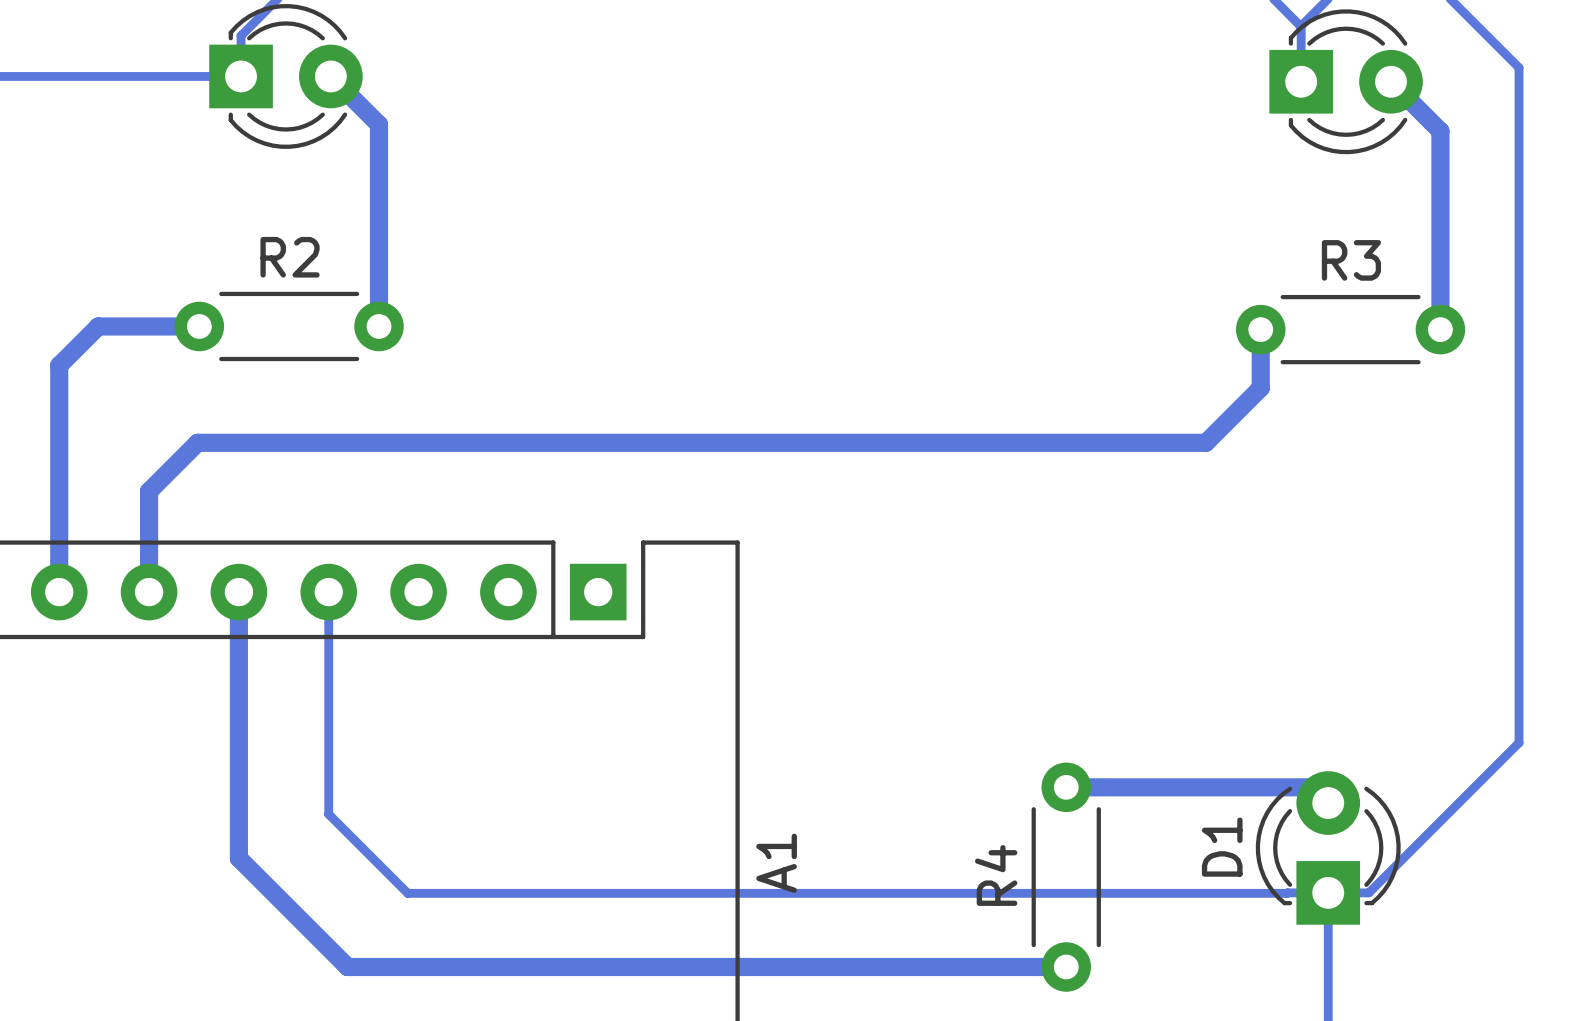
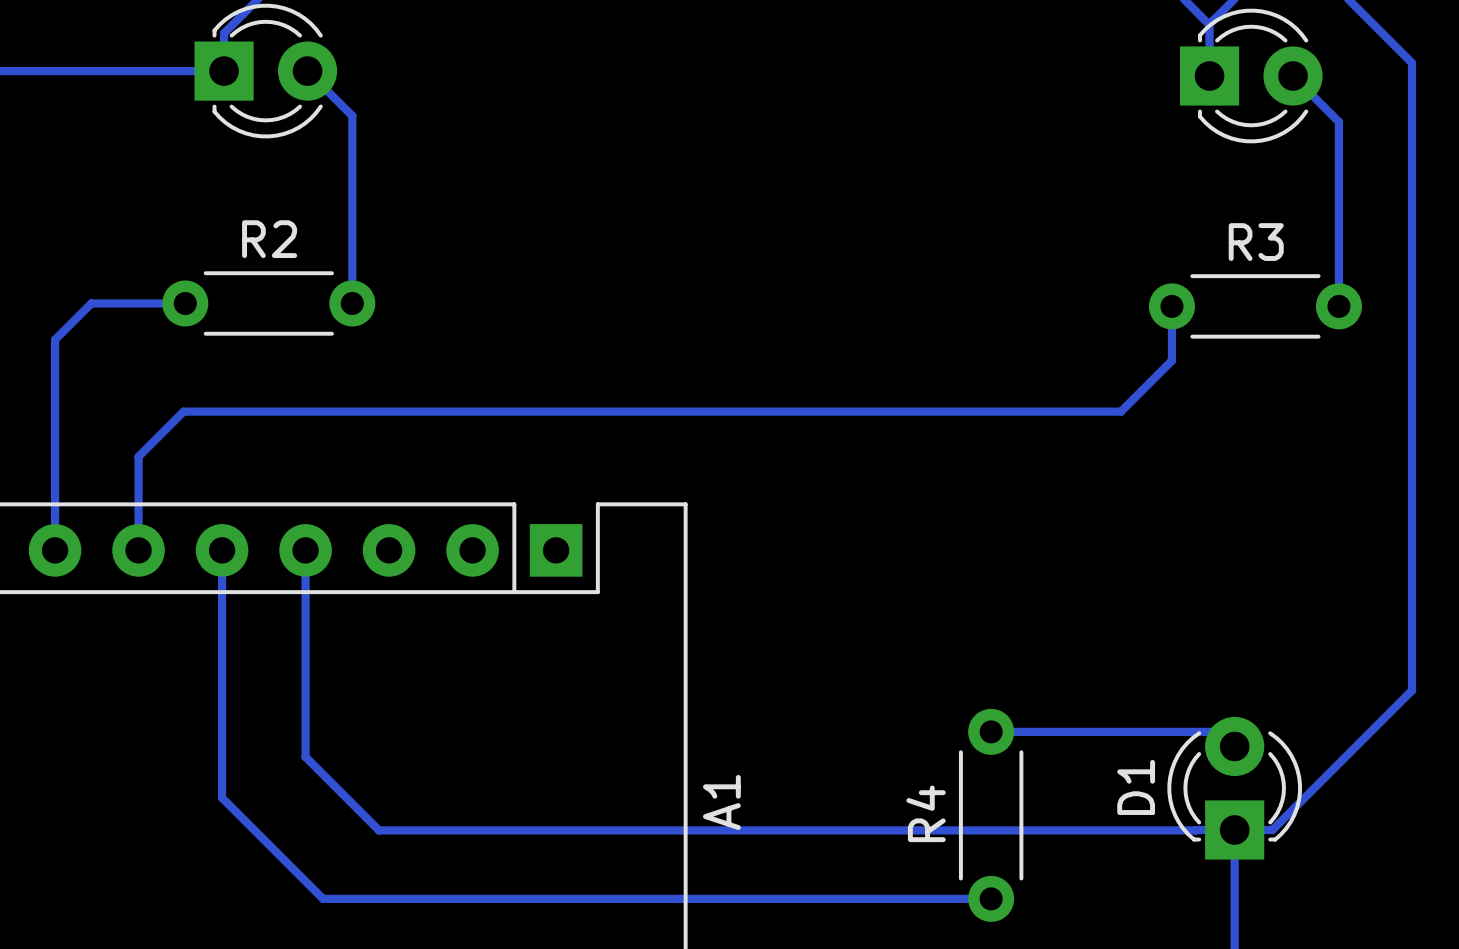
bottom track width: thick (330, 76) (379, 124) (379, 326) -> thin (307, 71) (352, 115) (352, 303)
bottom track width: thick (1391, 81) (1440, 131) (1440, 329) -> thin (1293, 76) (1338, 121) (1338, 306)
bottom track width: thick (199, 326) (98, 326) (59, 365) (59, 592) -> thin (185, 303) (91, 303) (55, 339) (55, 550)
bottom track width: thick (1260, 329) (1260, 388) (1205, 442) (197, 442) (149, 491) (149, 592) -> thin (1171, 306) (1171, 360) (1121, 411) (183, 411) (138, 456) (138, 550)
bottom track width: thick (238, 592) (238, 858) (347, 966) (1066, 966) -> thin (222, 550) (222, 797) (323, 898) (991, 898)
bottom track width: thick (1066, 787) (1312, 787) (1328, 803) -> thin (991, 731) (1220, 731) (1234, 746)

